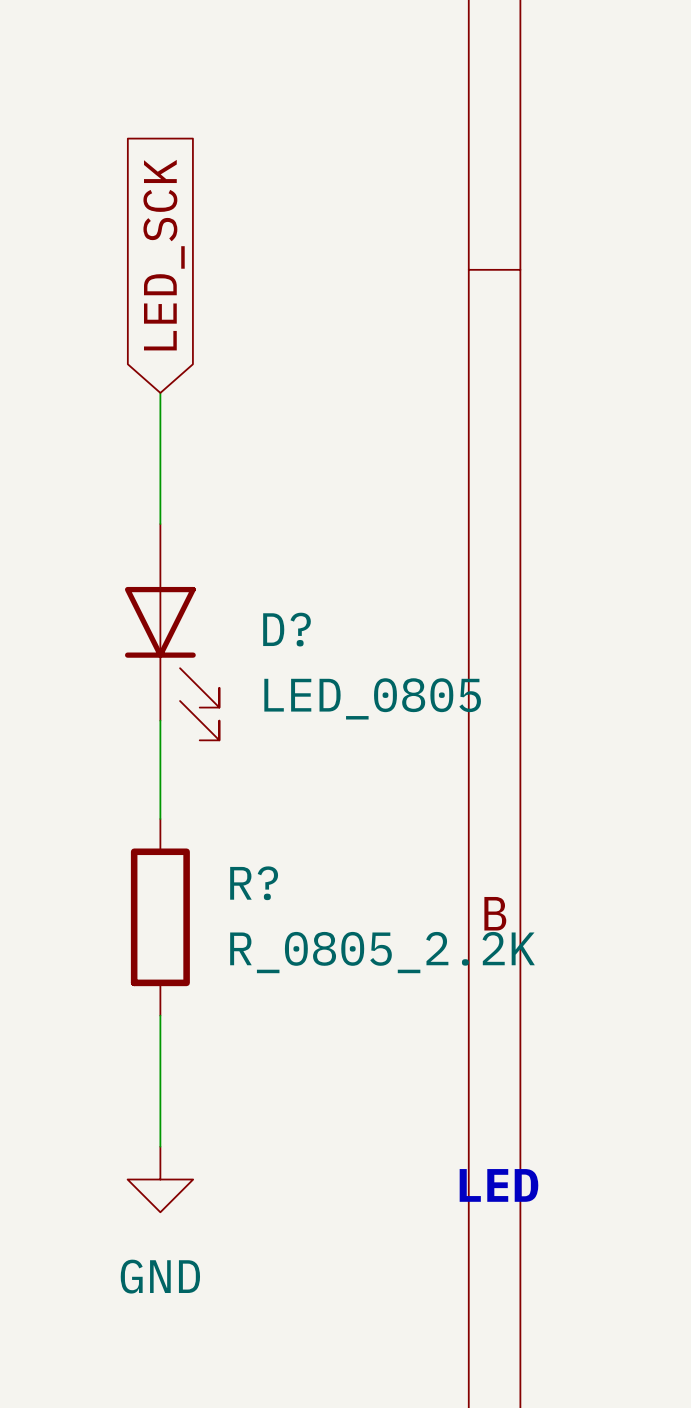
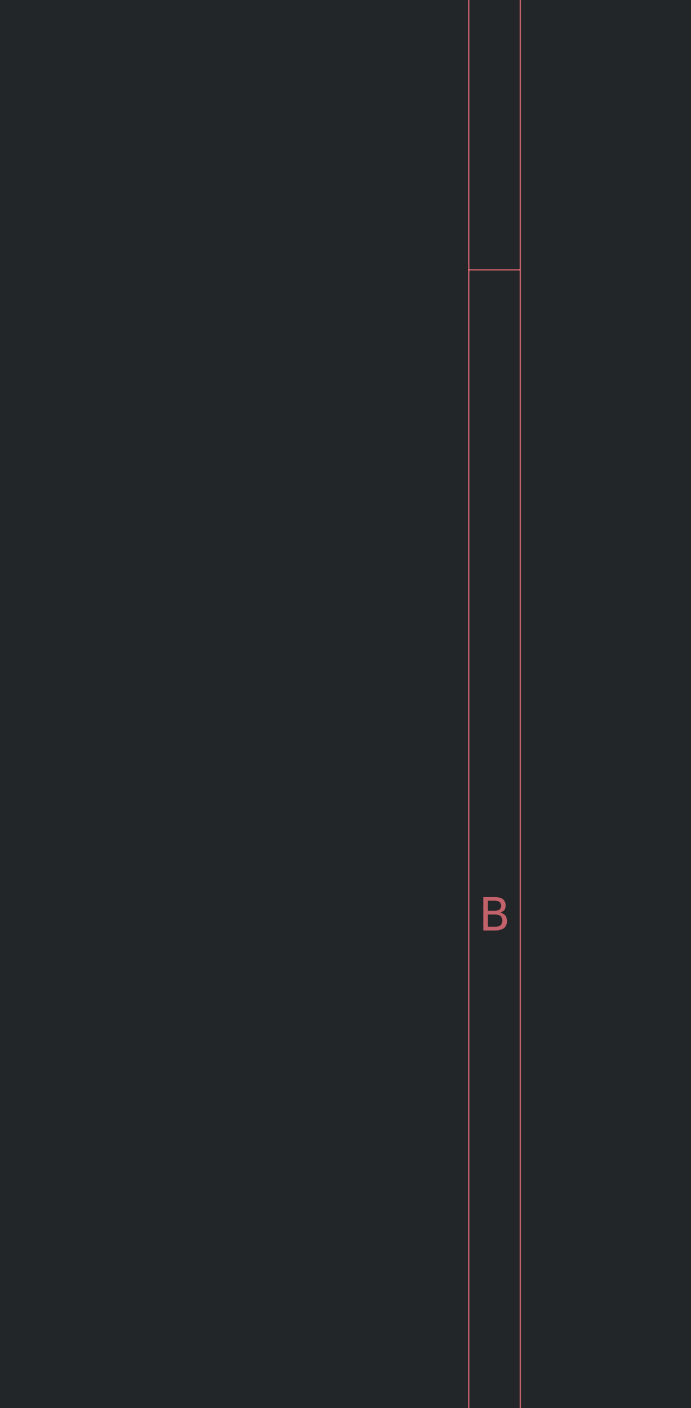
global label: LED_SCK (164, 255) -> none
wire: (160, 392) (160, 524) -> none
D?: LED_0805 (172, 632) -> none
wire: (160, 720) (160, 818) -> none
R?: R_0805_2.2K (160, 917) -> none
wire: (160, 1015) (160, 1146) -> none
power symbol: GND (160, 1179) -> none
text: LED (498, 1185) -> none

